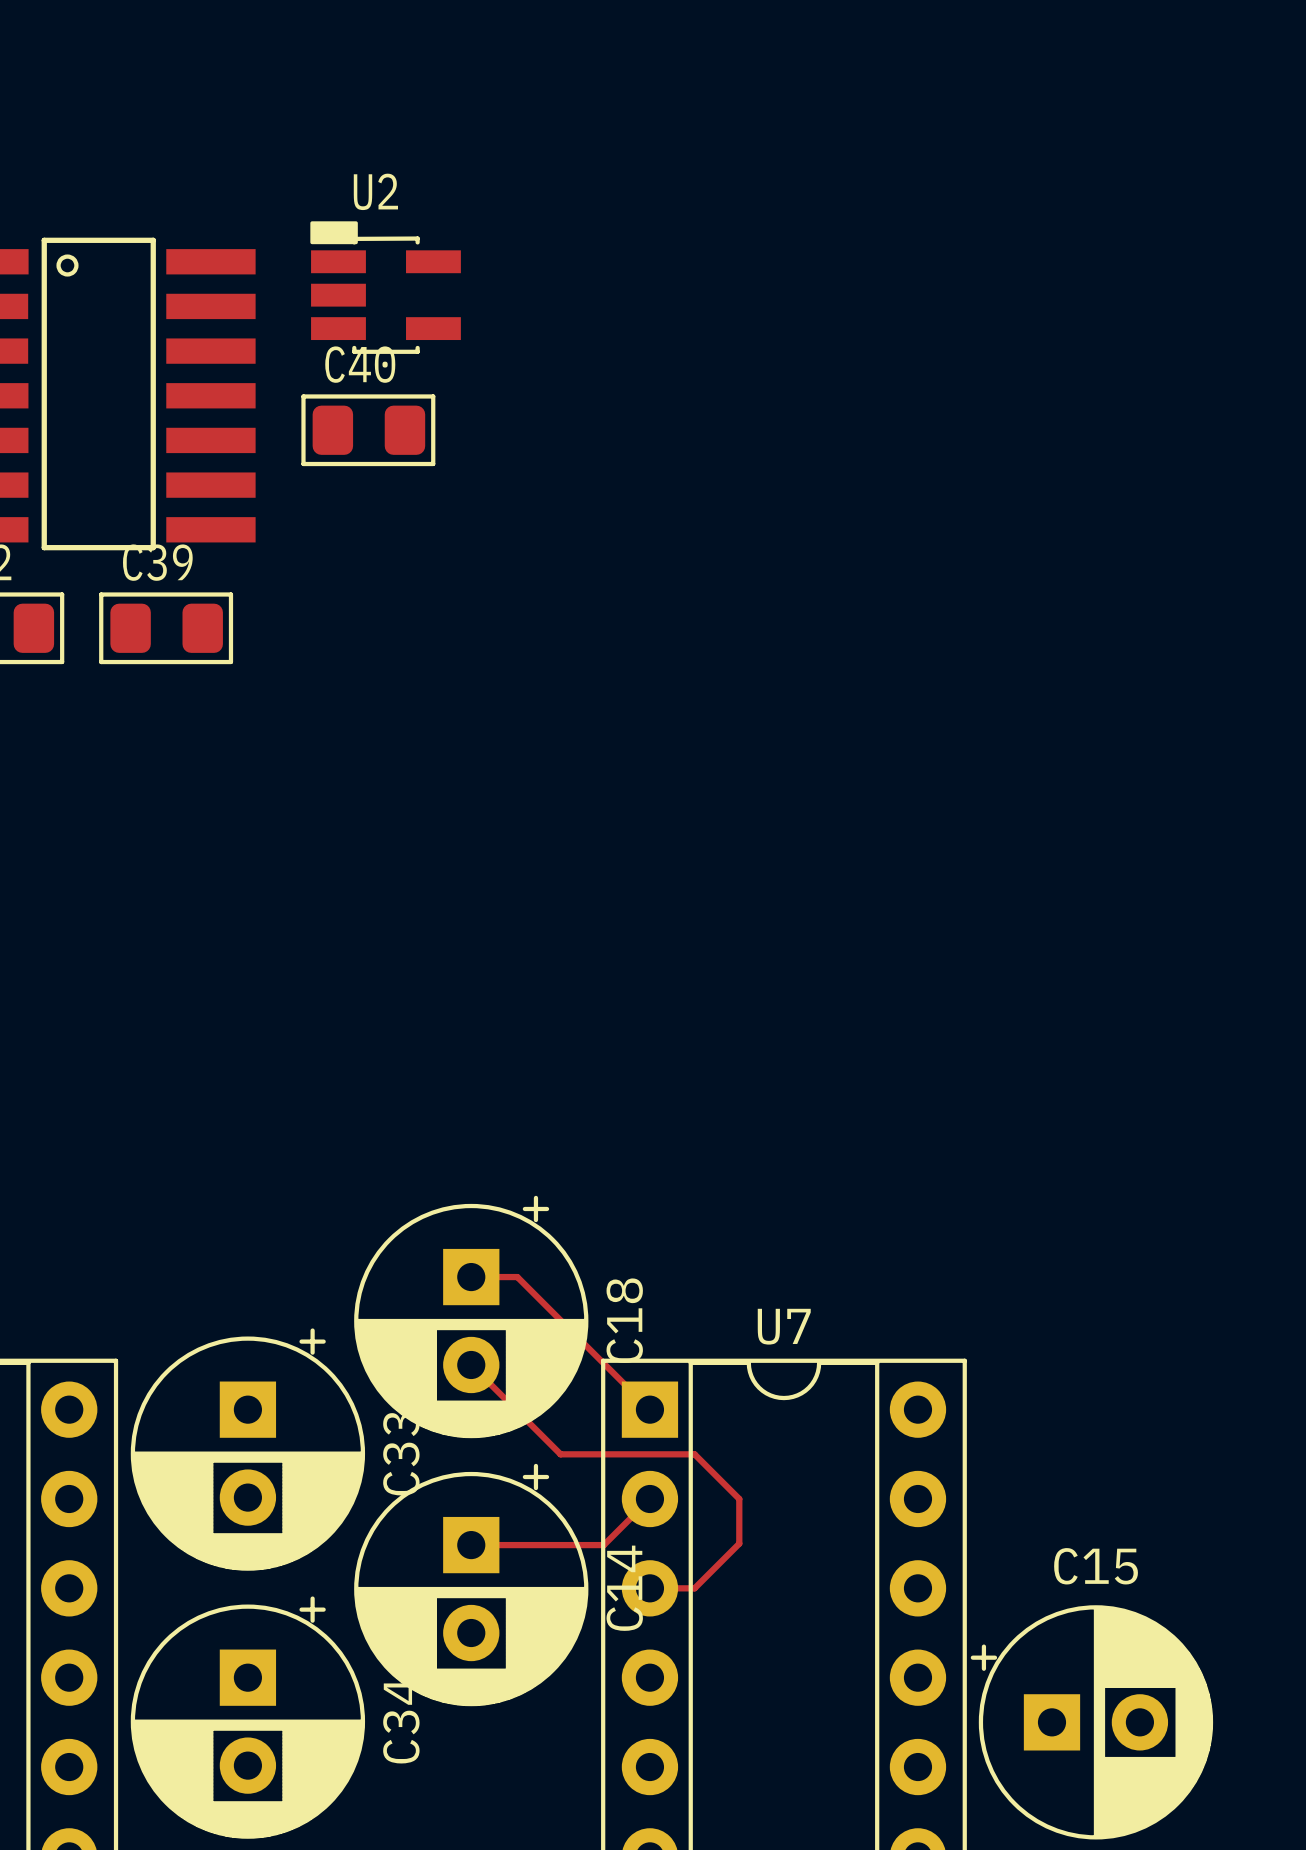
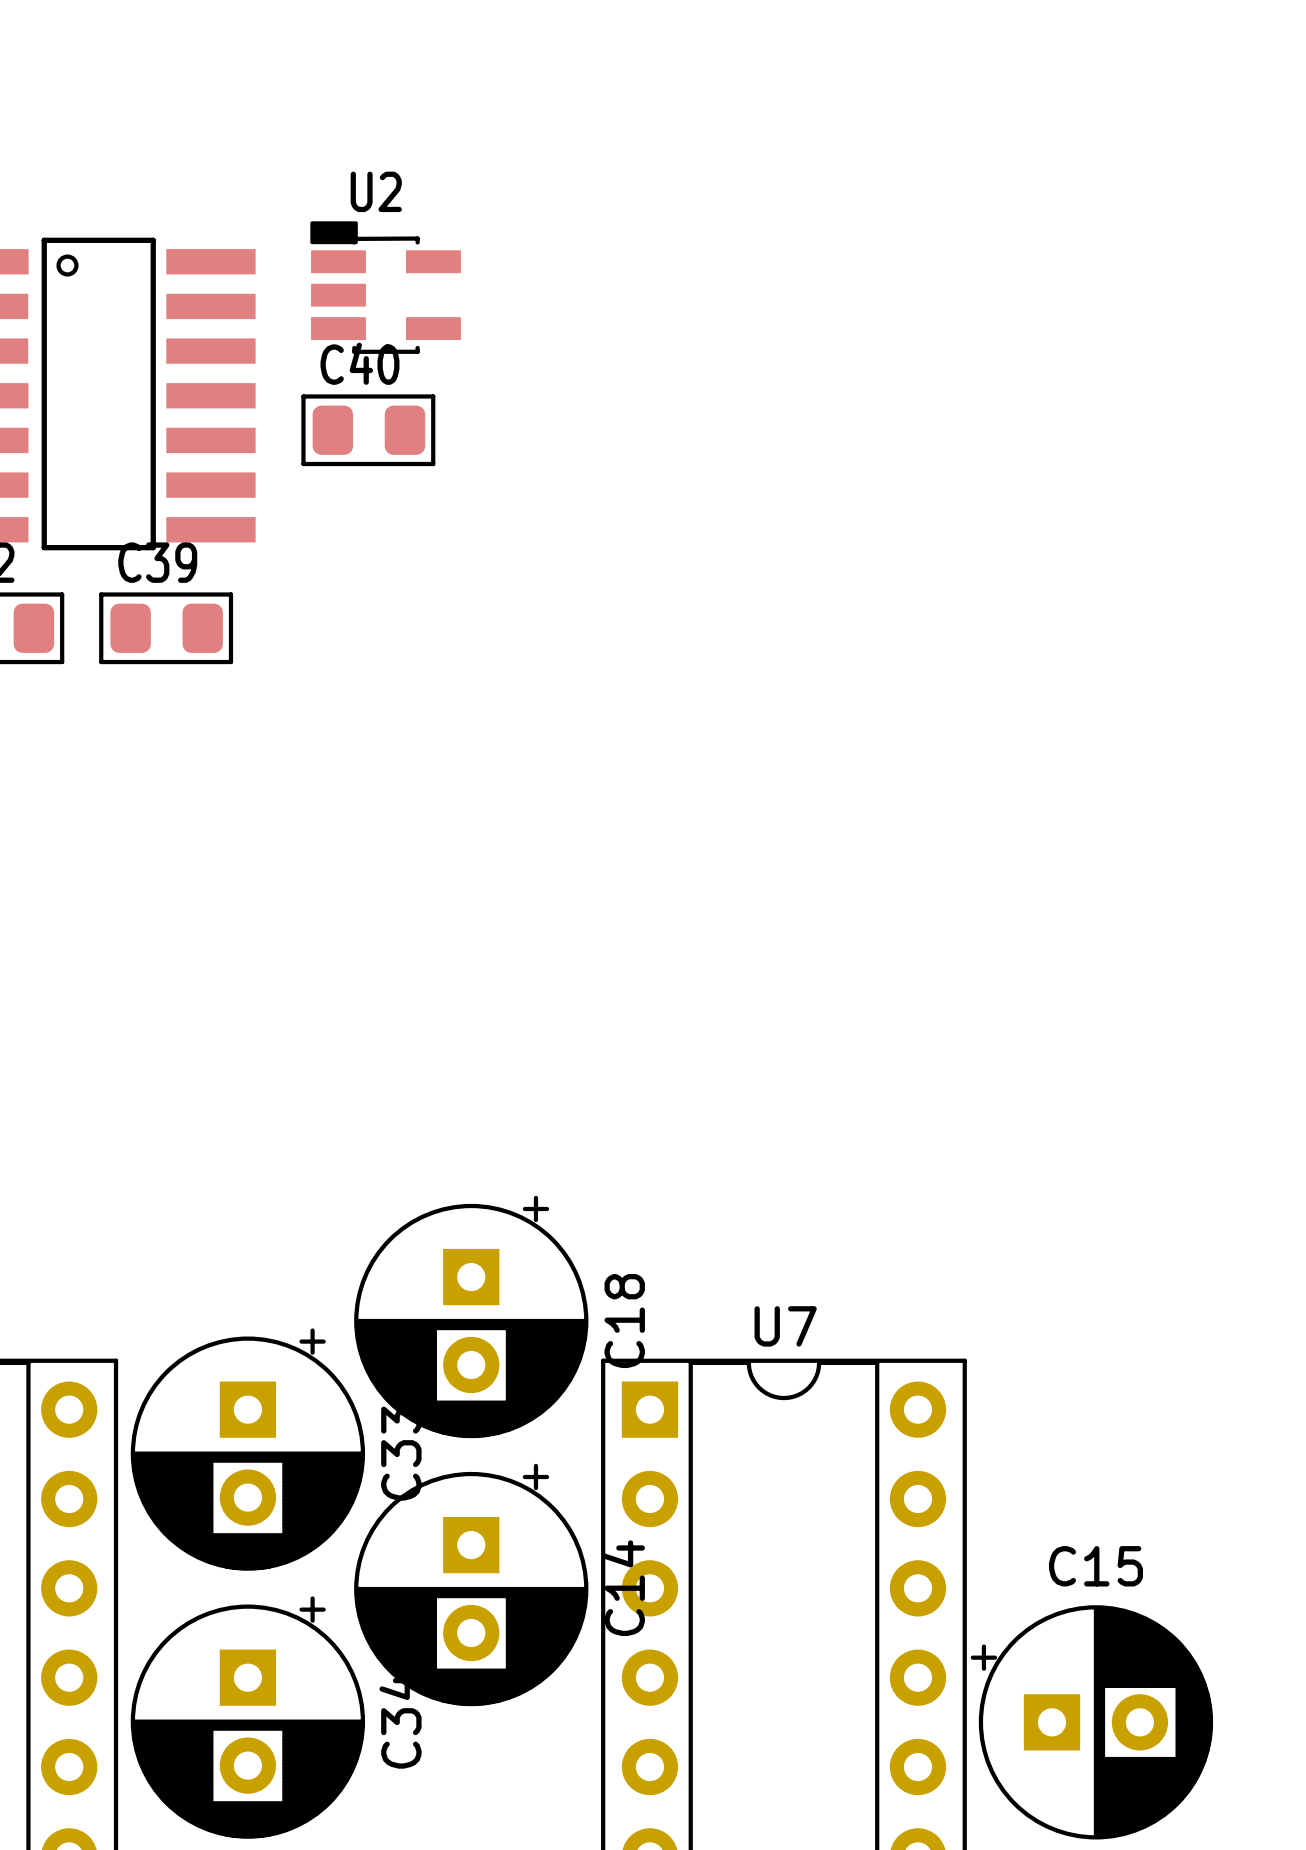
track: (471, 1277) (517, 1277) (649, 1409) -> none
track: (471, 1364) (560, 1454) (694, 1454) (739, 1499) (739, 1543) (694, 1588) (649, 1588) -> none
track: (649, 1499) (603, 1545) (471, 1545) -> none

